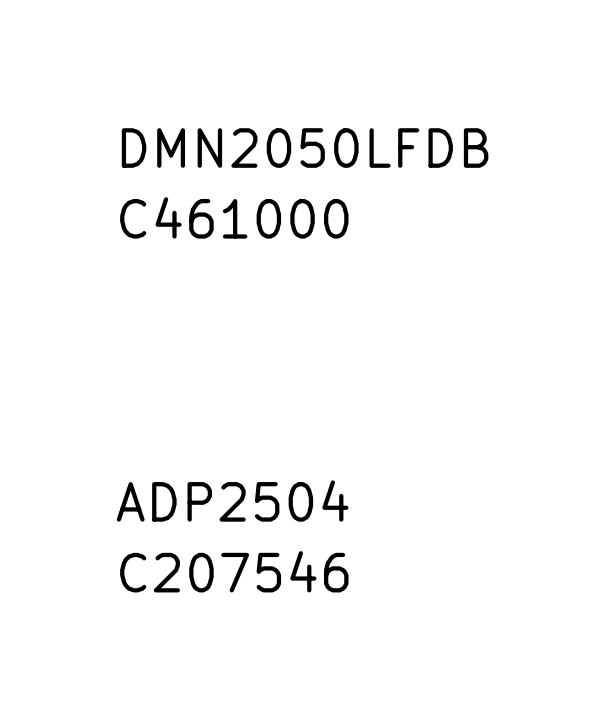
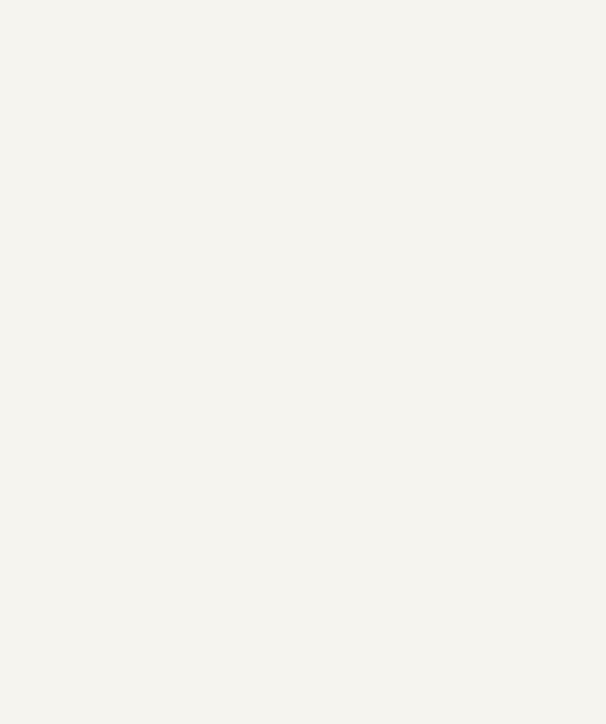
text: DMN2050LFDB (305, 148) -> none
text: C461000 (234, 217) -> none
text: ADP2504 (232, 501) -> none
text: C207546 (234, 571) -> none

